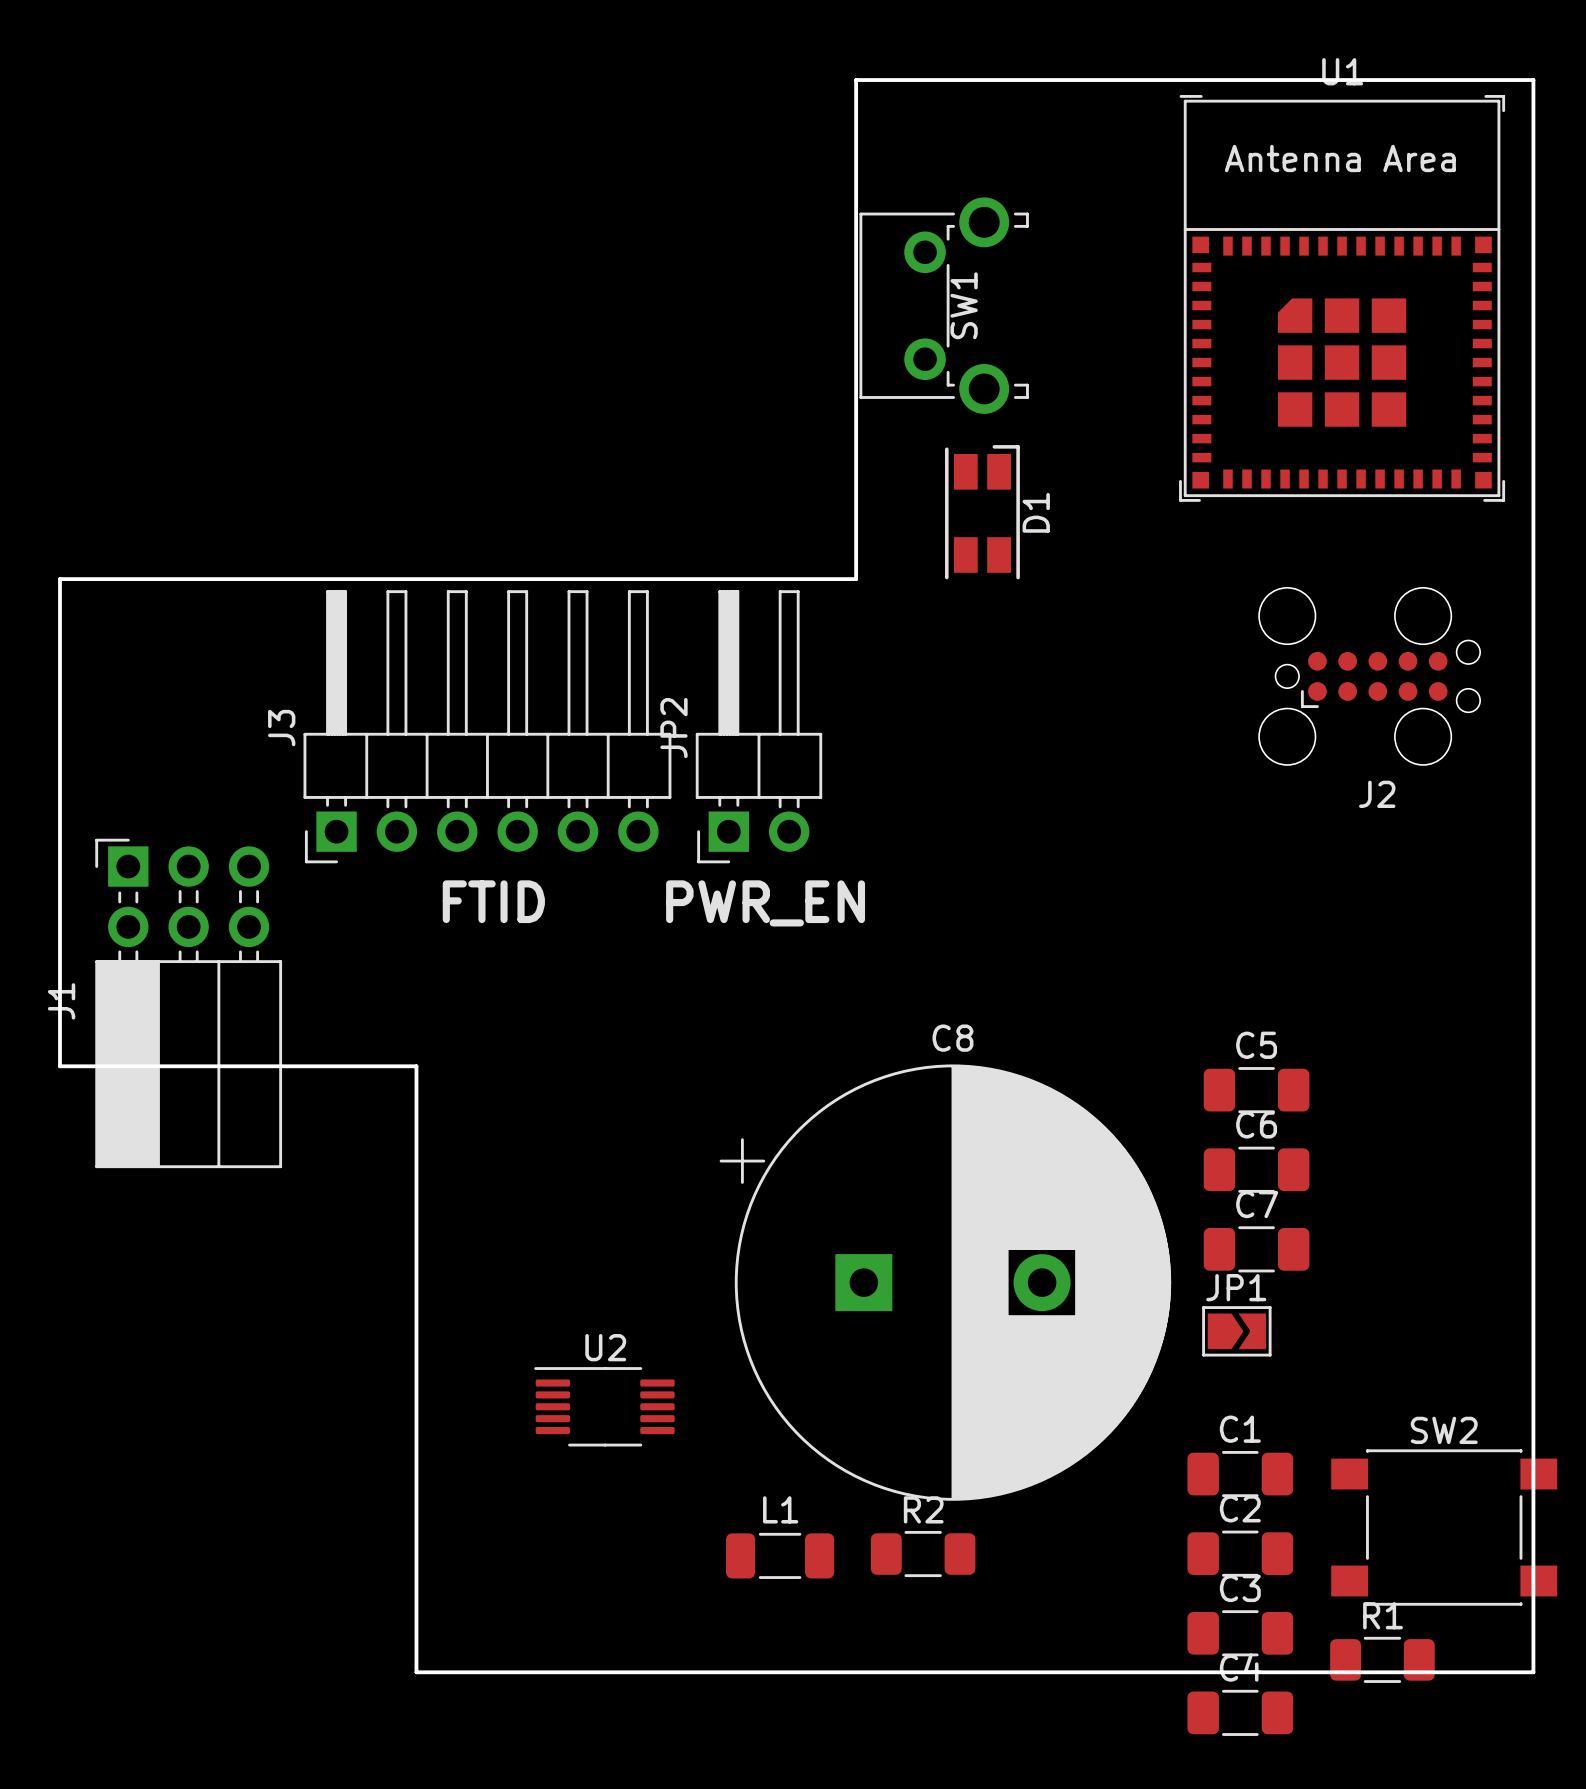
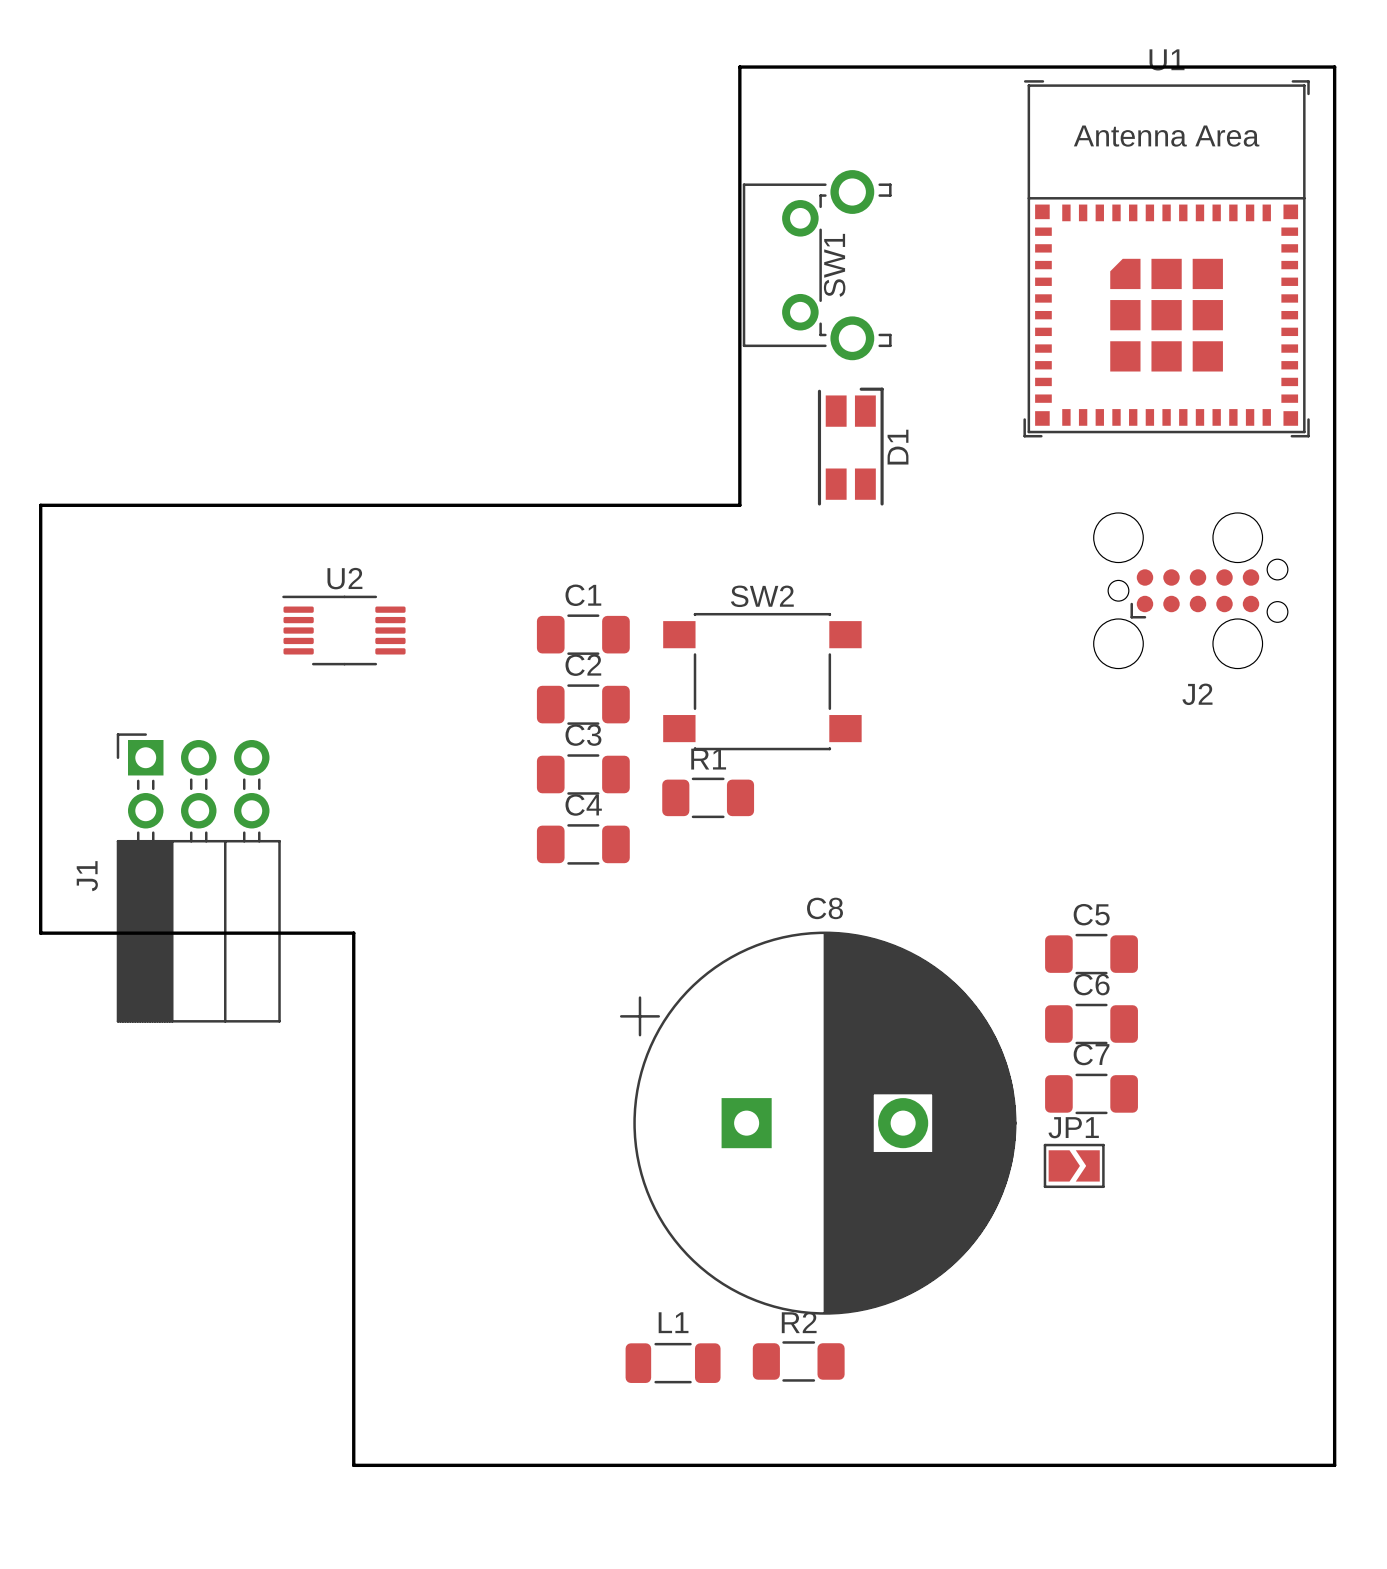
J3: (487, 726) -> none
JP2: (758, 726) -> none
text: FTID (493, 901) -> none
text: PWR_EN (765, 903) -> none
J1 position: (188, 1003) -> (198, 877)
U2 position: (604, 1406) -> (343, 630)
C1 position: (1240, 1474) -> (583, 634)
SW2 position: (1444, 1527) -> (762, 681)
C2 position: (1240, 1553) -> (583, 704)
C3 position: (1240, 1633) -> (583, 774)
R1 position: (1382, 1659) -> (708, 797)
C4 position: (1240, 1712) -> (583, 844)

